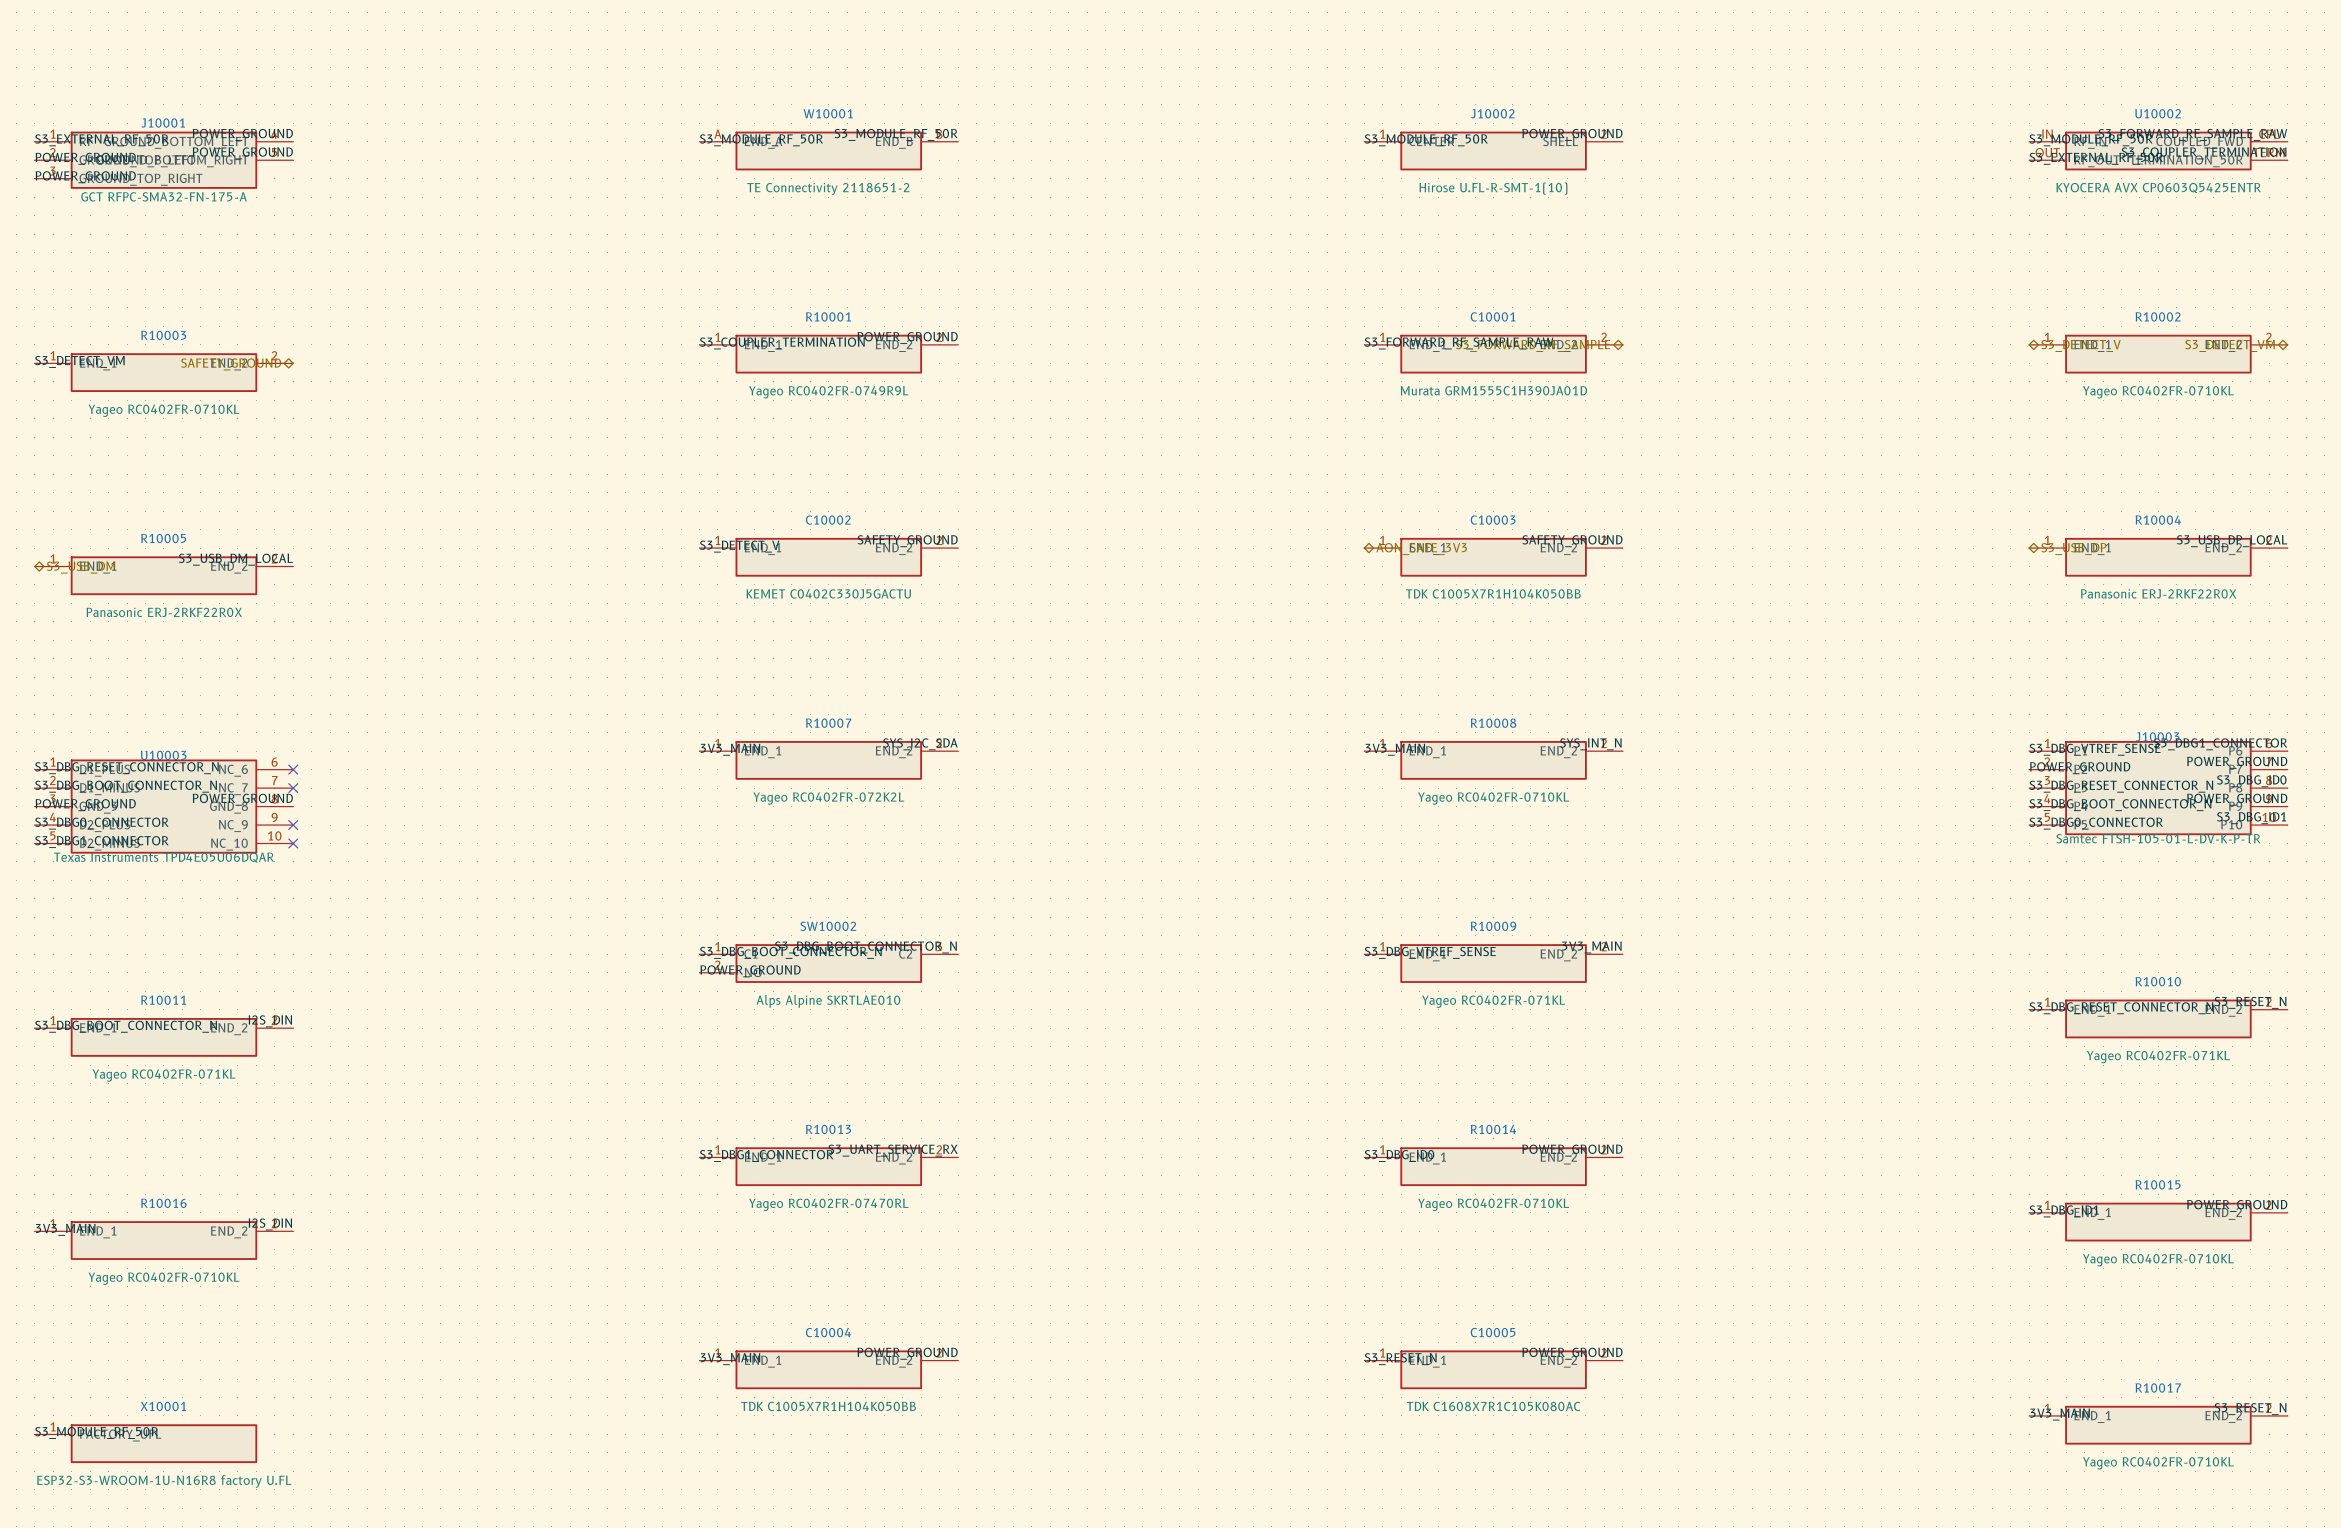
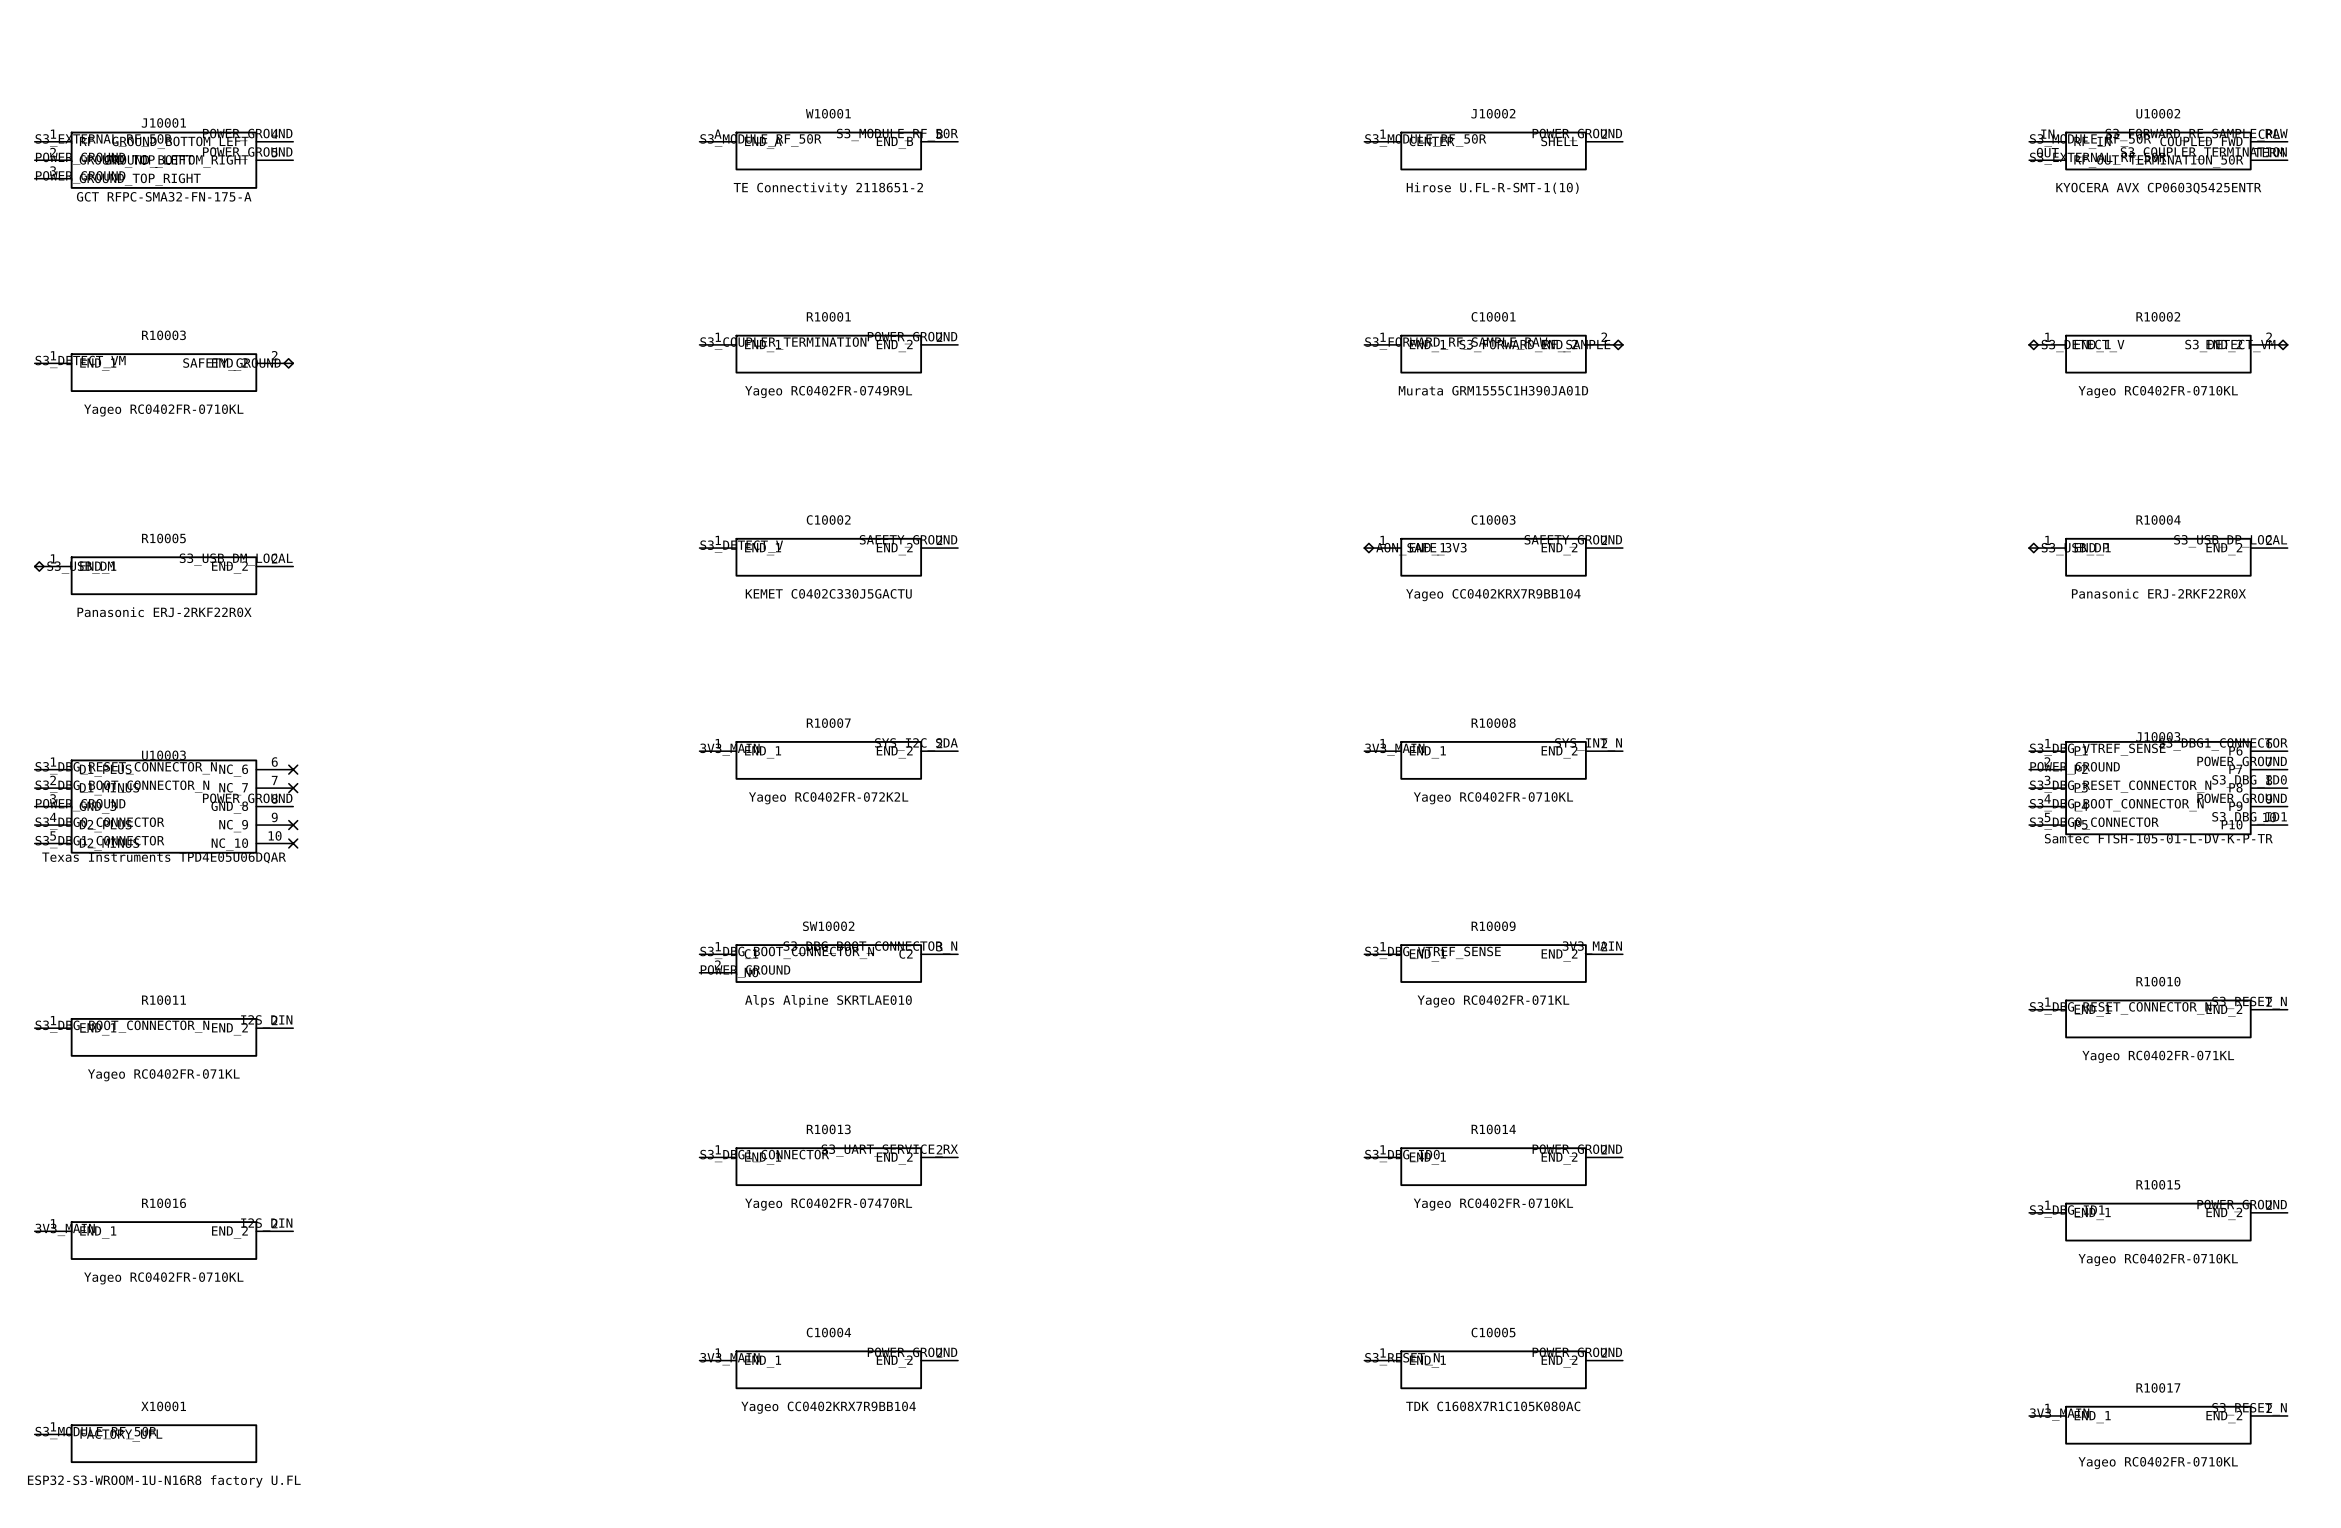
C10003 value: TDK C1005X7R1H104K050BB (1493, 593) -> Yageo CC0402KRX7R9BB104 (1493, 595)
C10004 value: TDK C1005X7R1H104K050BB (828, 1406) -> Yageo CC0402KRX7R9BB104 (828, 1407)

